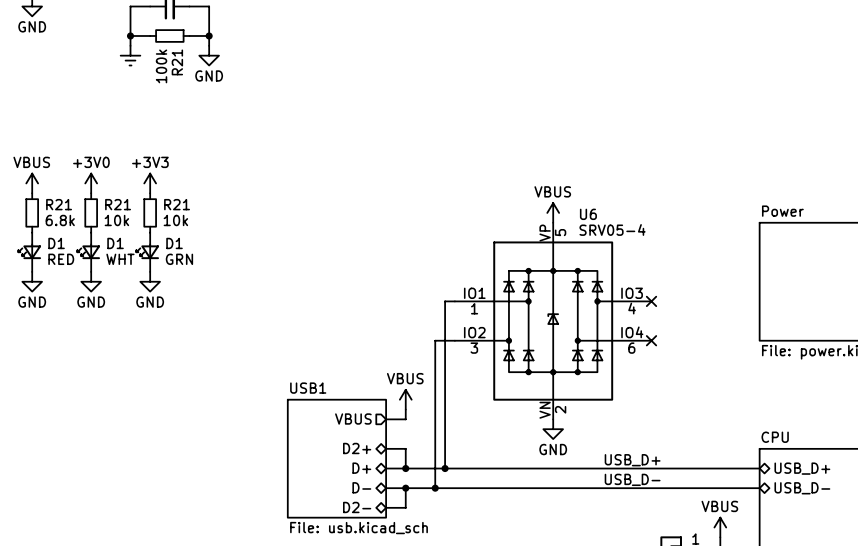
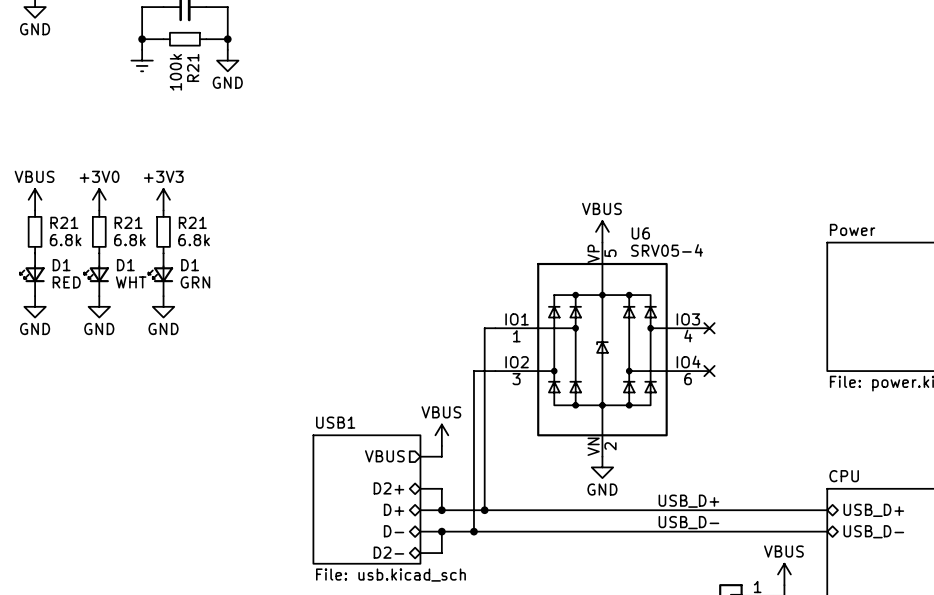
R21 value: 10k (116, 220) -> 6.8k (129, 240)
R21 value: 10k (175, 220) -> 6.8k (194, 240)

